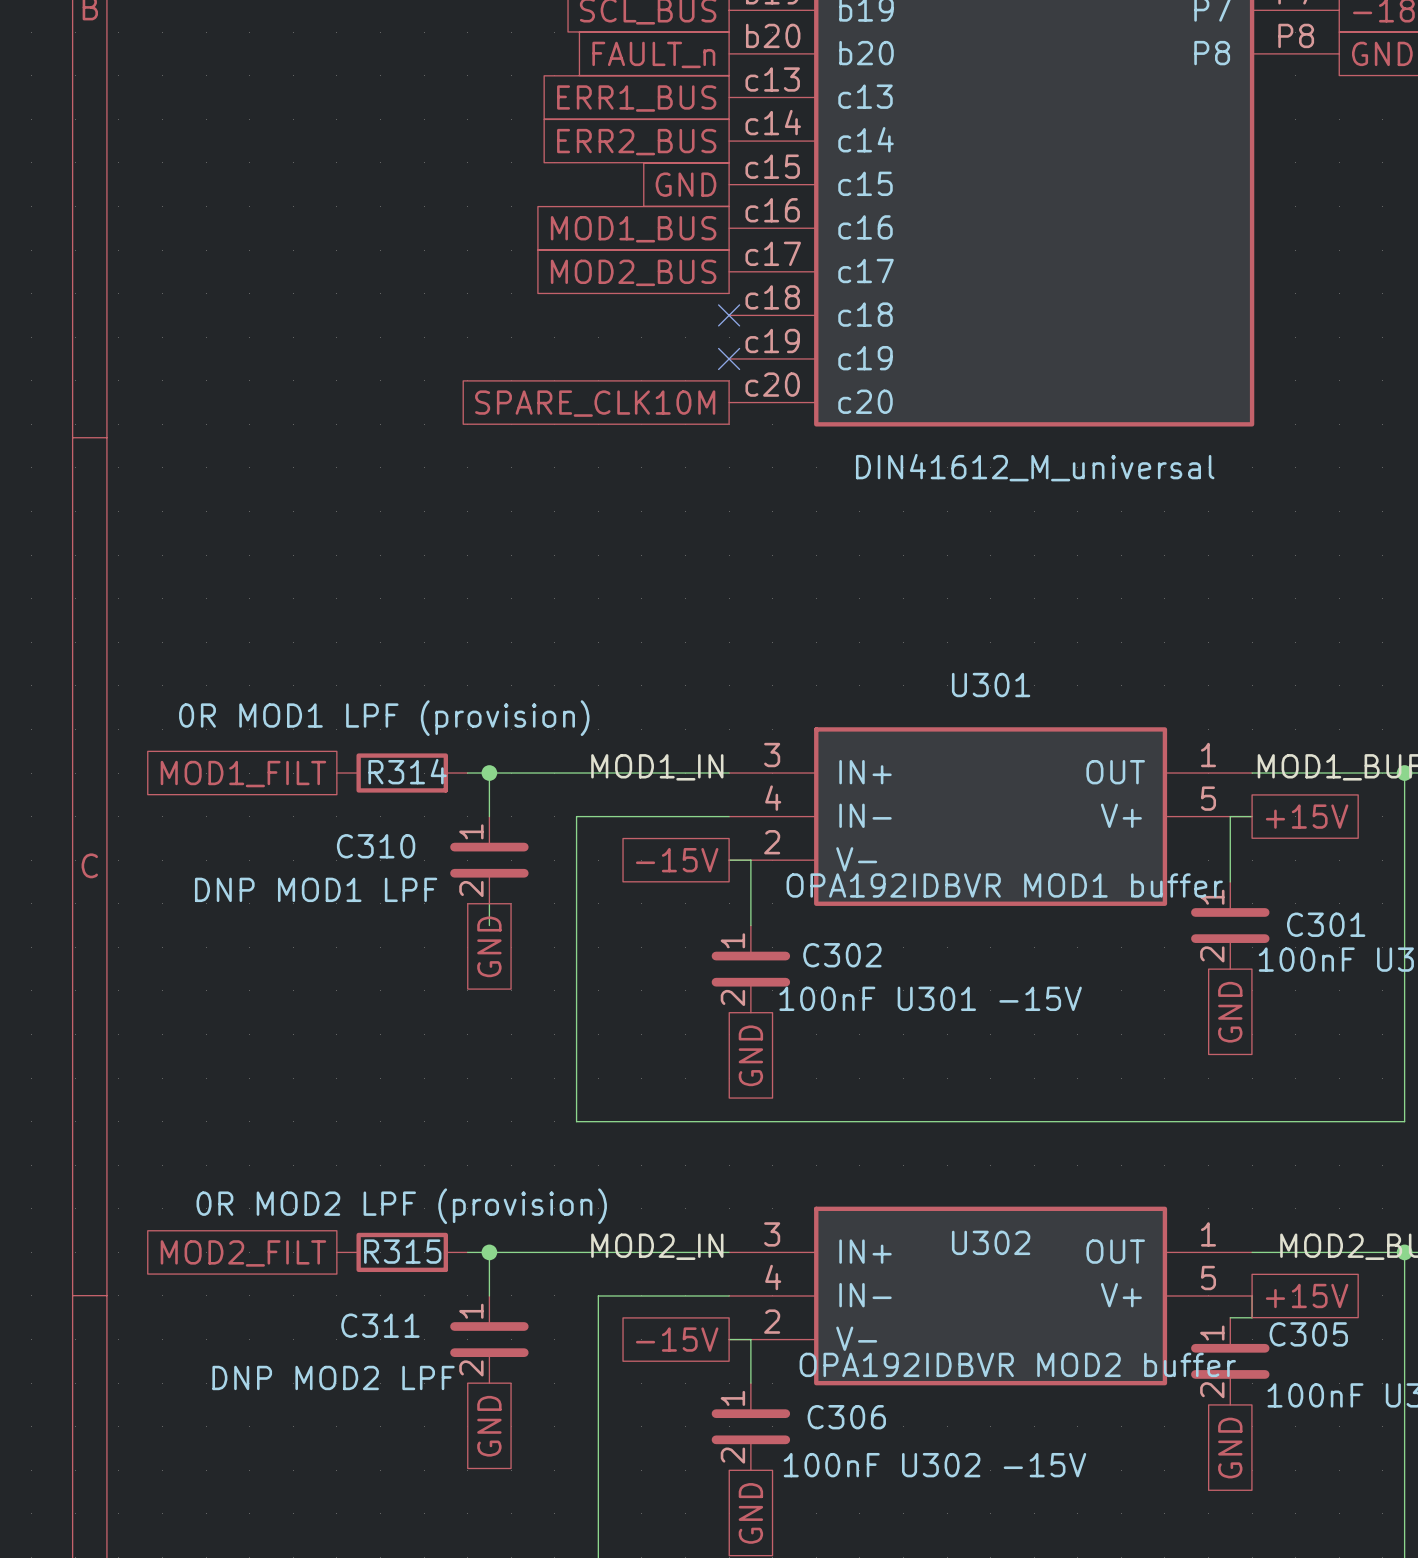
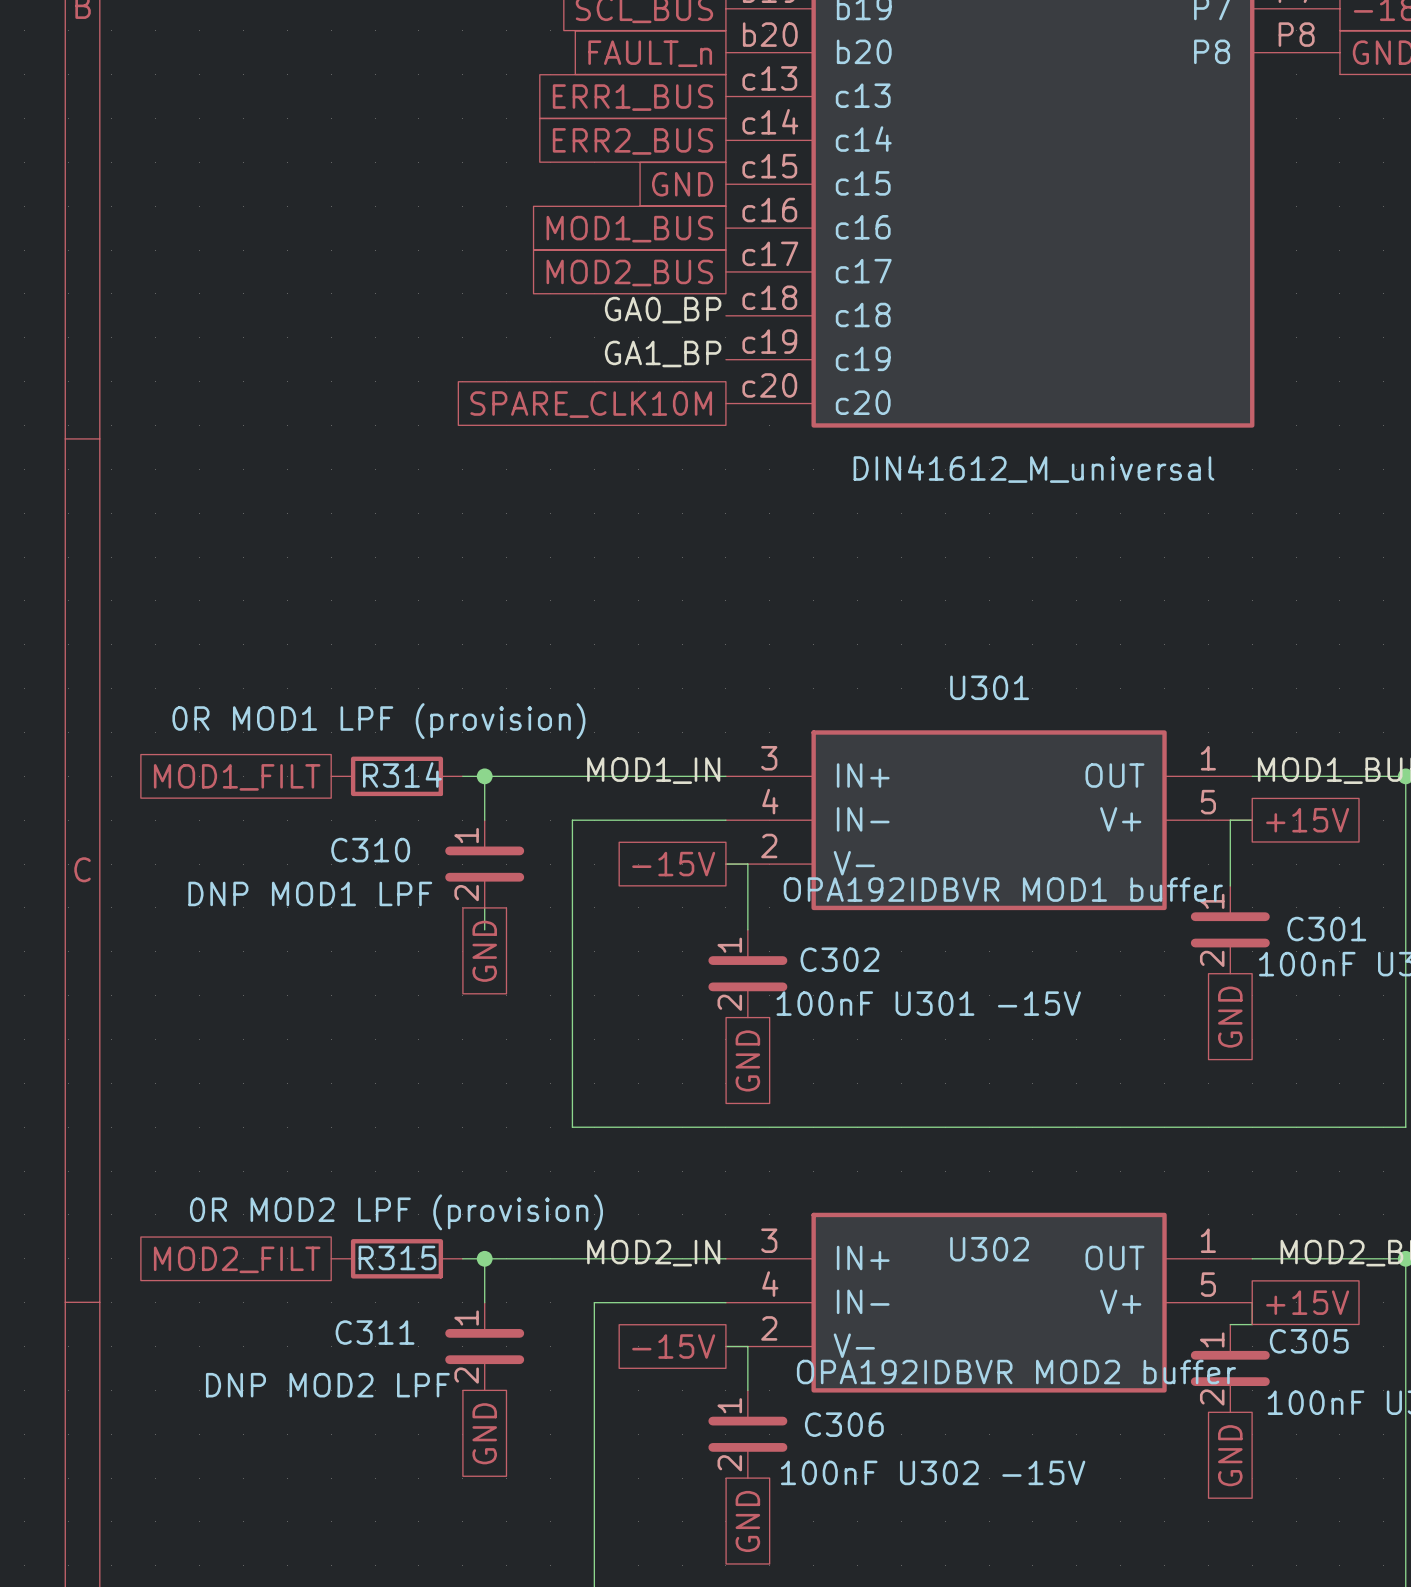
label: none -> GA0_BP (663, 310)
no-connect mark: (729, 315) -> none
label: none -> GA1_BP (663, 353)
no-connect mark: (729, 358) -> none

